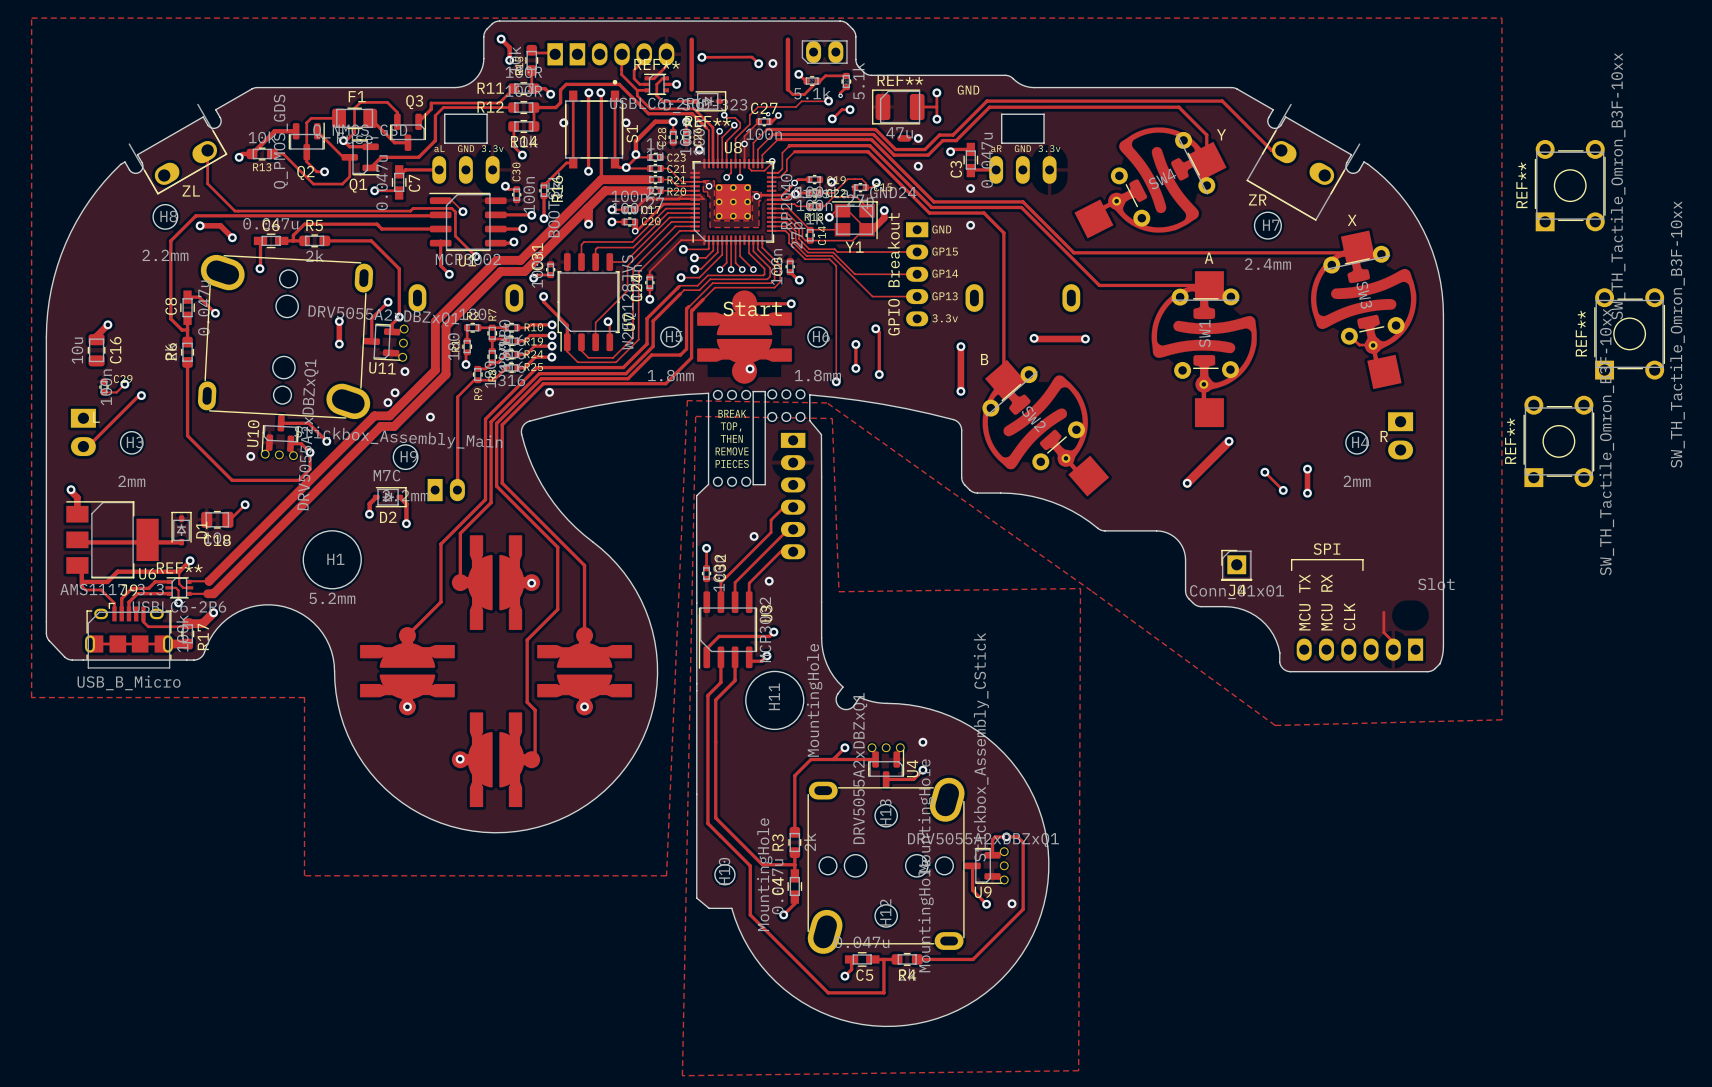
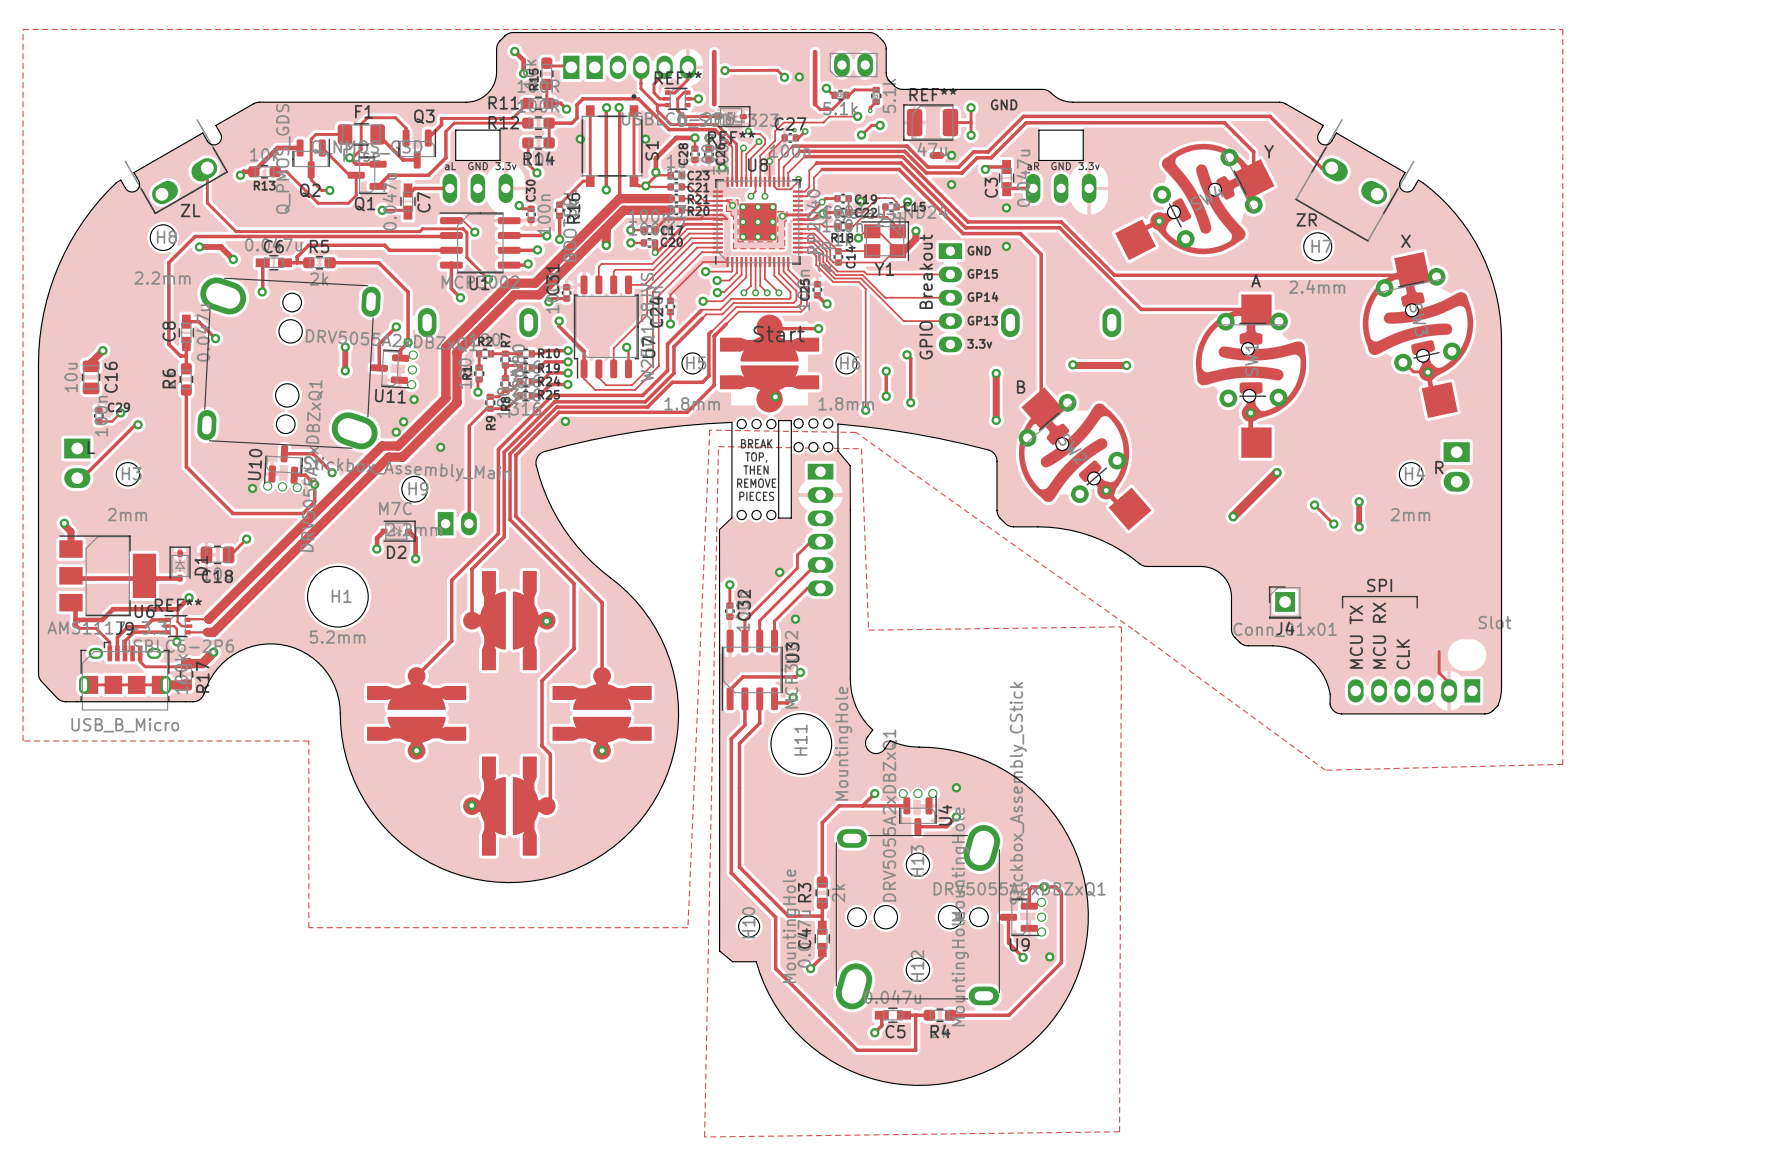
SW4 footprint: [1074, 127, 1227, 239] -> [1115, 143, 1275, 261]
REF**: SW_TH_Tactile_Omron_B3F-10xx (1570, 185) -> none
SW3 footprint: [1310, 230, 1417, 390] -> [1362, 251, 1474, 419]
SW1 footprint: [1151, 271, 1257, 428] -> [1195, 294, 1307, 458]
REF**: SW_TH_Tactile_Omron_B3F-10xx (1629, 333) -> none
SW2 footprint: [982, 359, 1110, 497] -> [1018, 387, 1152, 531]
REF**: SW_TH_Tactile_Omron_B3F-10xx (1558, 441) -> none

